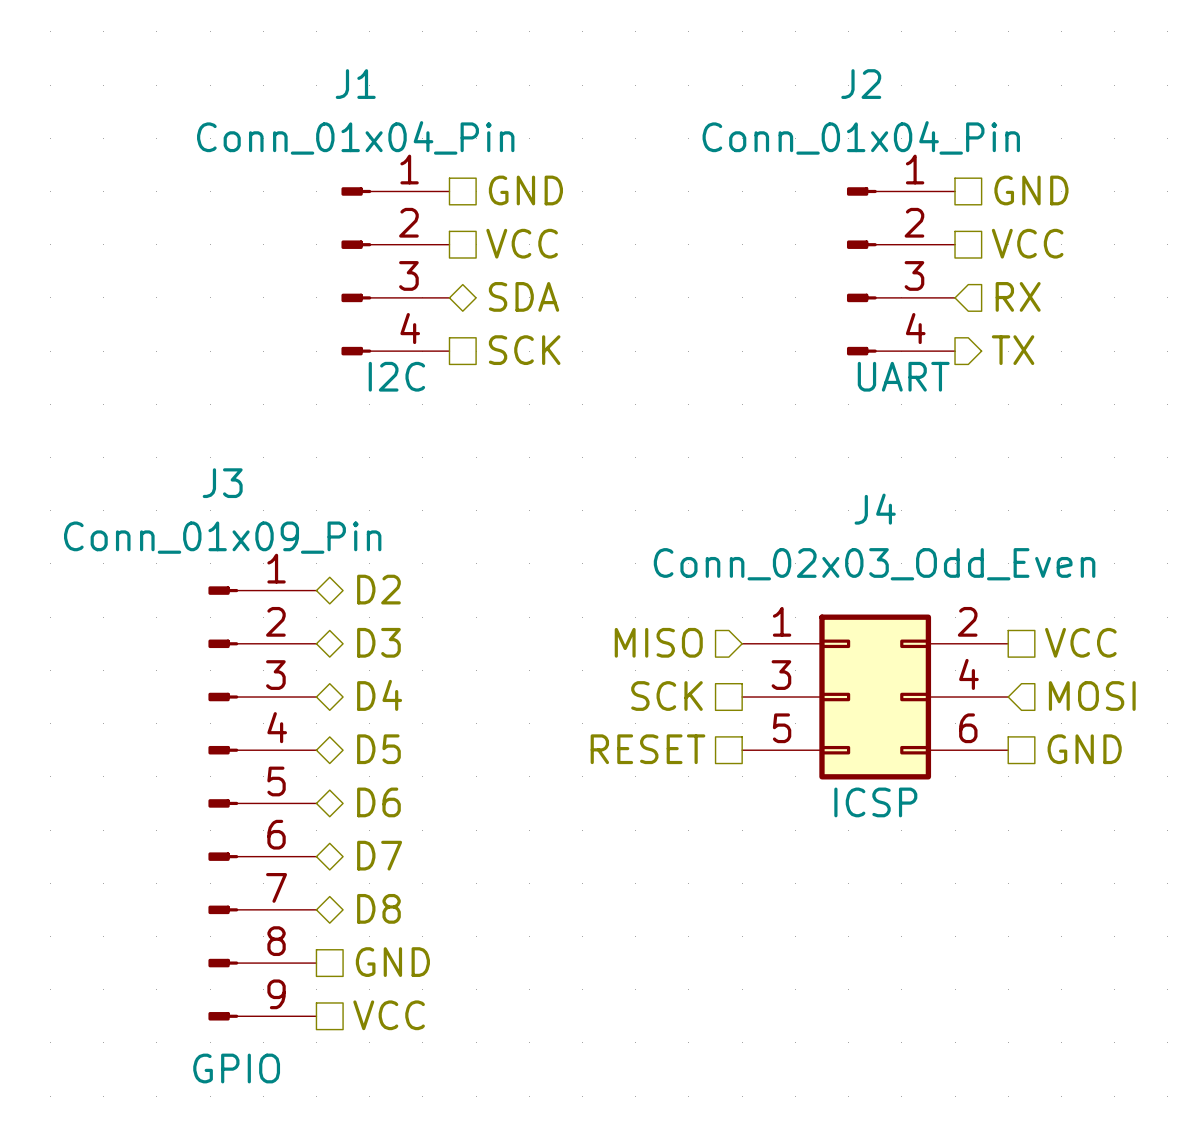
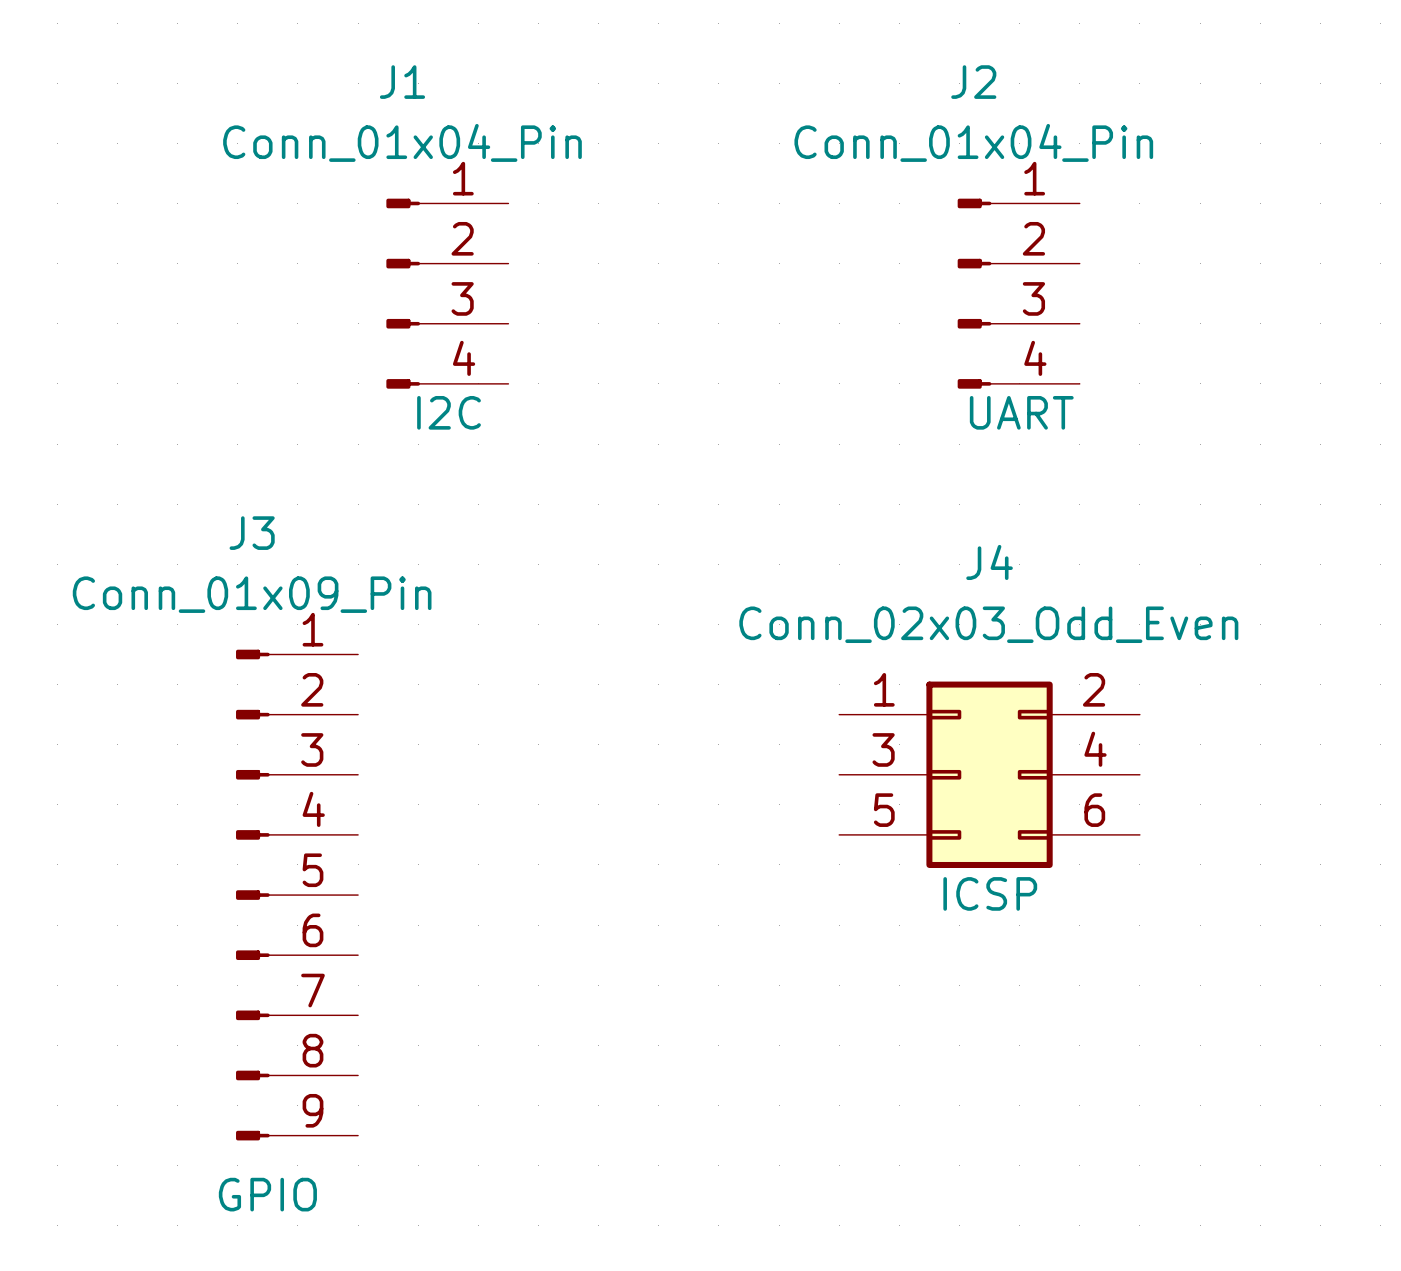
hierarchical label: GND (525, 190) -> none
hierarchical label: GND (1031, 190) -> none
hierarchical label: VCC (522, 243) -> none
hierarchical label: VCC (1027, 243) -> none
hierarchical label: SDA (524, 296) -> none
hierarchical label: RX (1018, 296) -> none
hierarchical label: SCK (524, 350) -> none
hierarchical label: TX (1013, 350) -> none
hierarchical label: D2 (378, 589) -> none
hierarchical label: D3 (378, 642) -> none
hierarchical label: MISO (658, 642) -> none
hierarchical label: VCC (1080, 642) -> none
hierarchical label: D4 (379, 695) -> none
hierarchical label: SCK (666, 696) -> none
hierarchical label: MOSI (1092, 696) -> none
hierarchical label: D5 (378, 749) -> none
hierarchical label: RESET (647, 749) -> none
hierarchical label: GND (1084, 749) -> none
hierarchical label: D6 (378, 802) -> none
hierarchical label: D7 (379, 855) -> none
hierarchical label: D8 (378, 908) -> none
hierarchical label: GND (392, 962) -> none
hierarchical label: VCC (389, 1015) -> none

